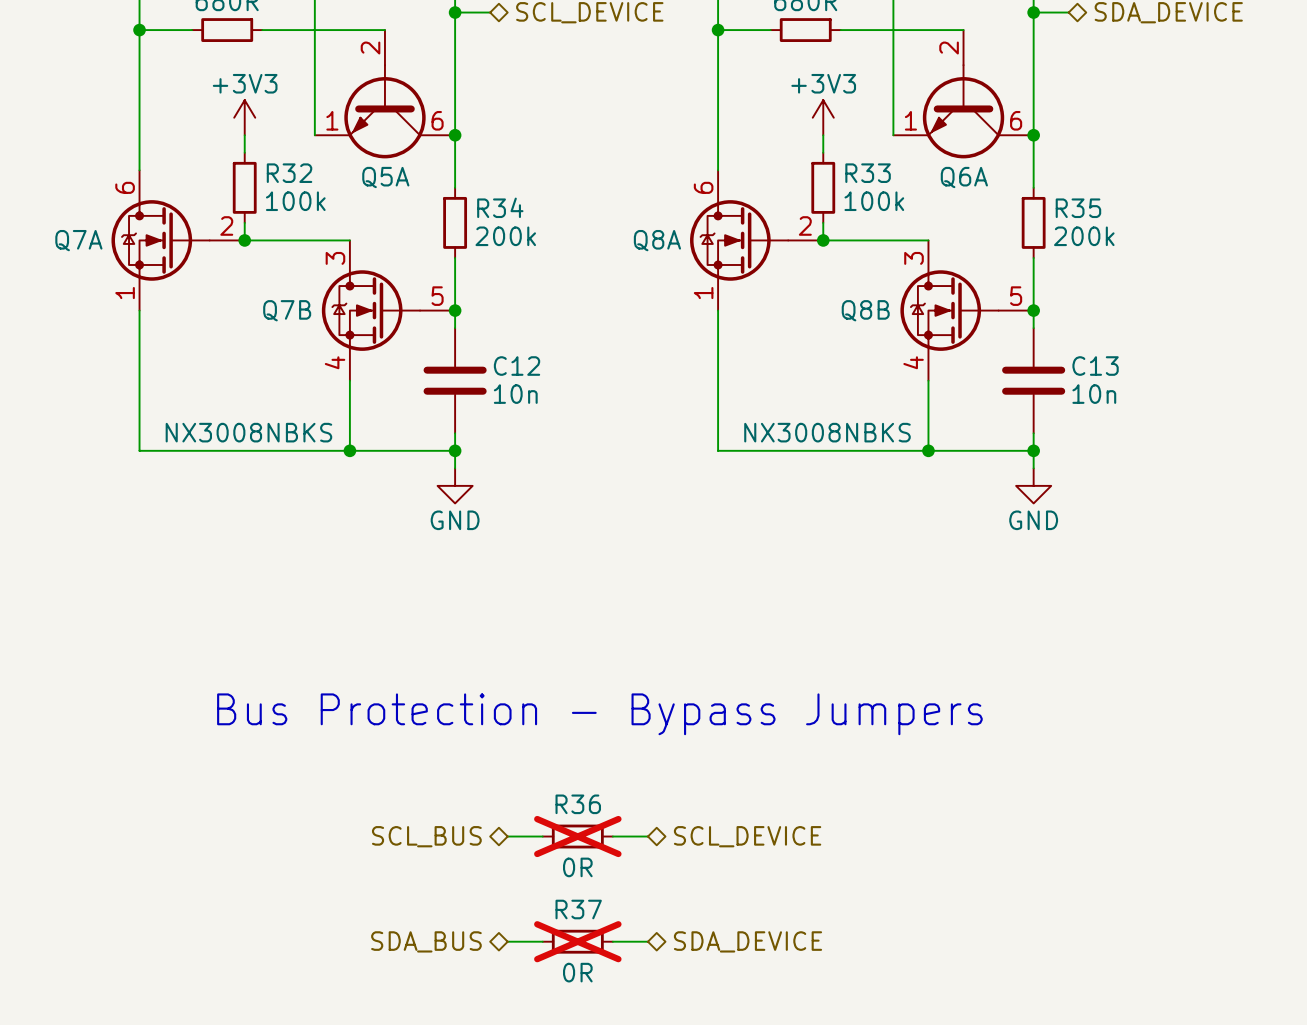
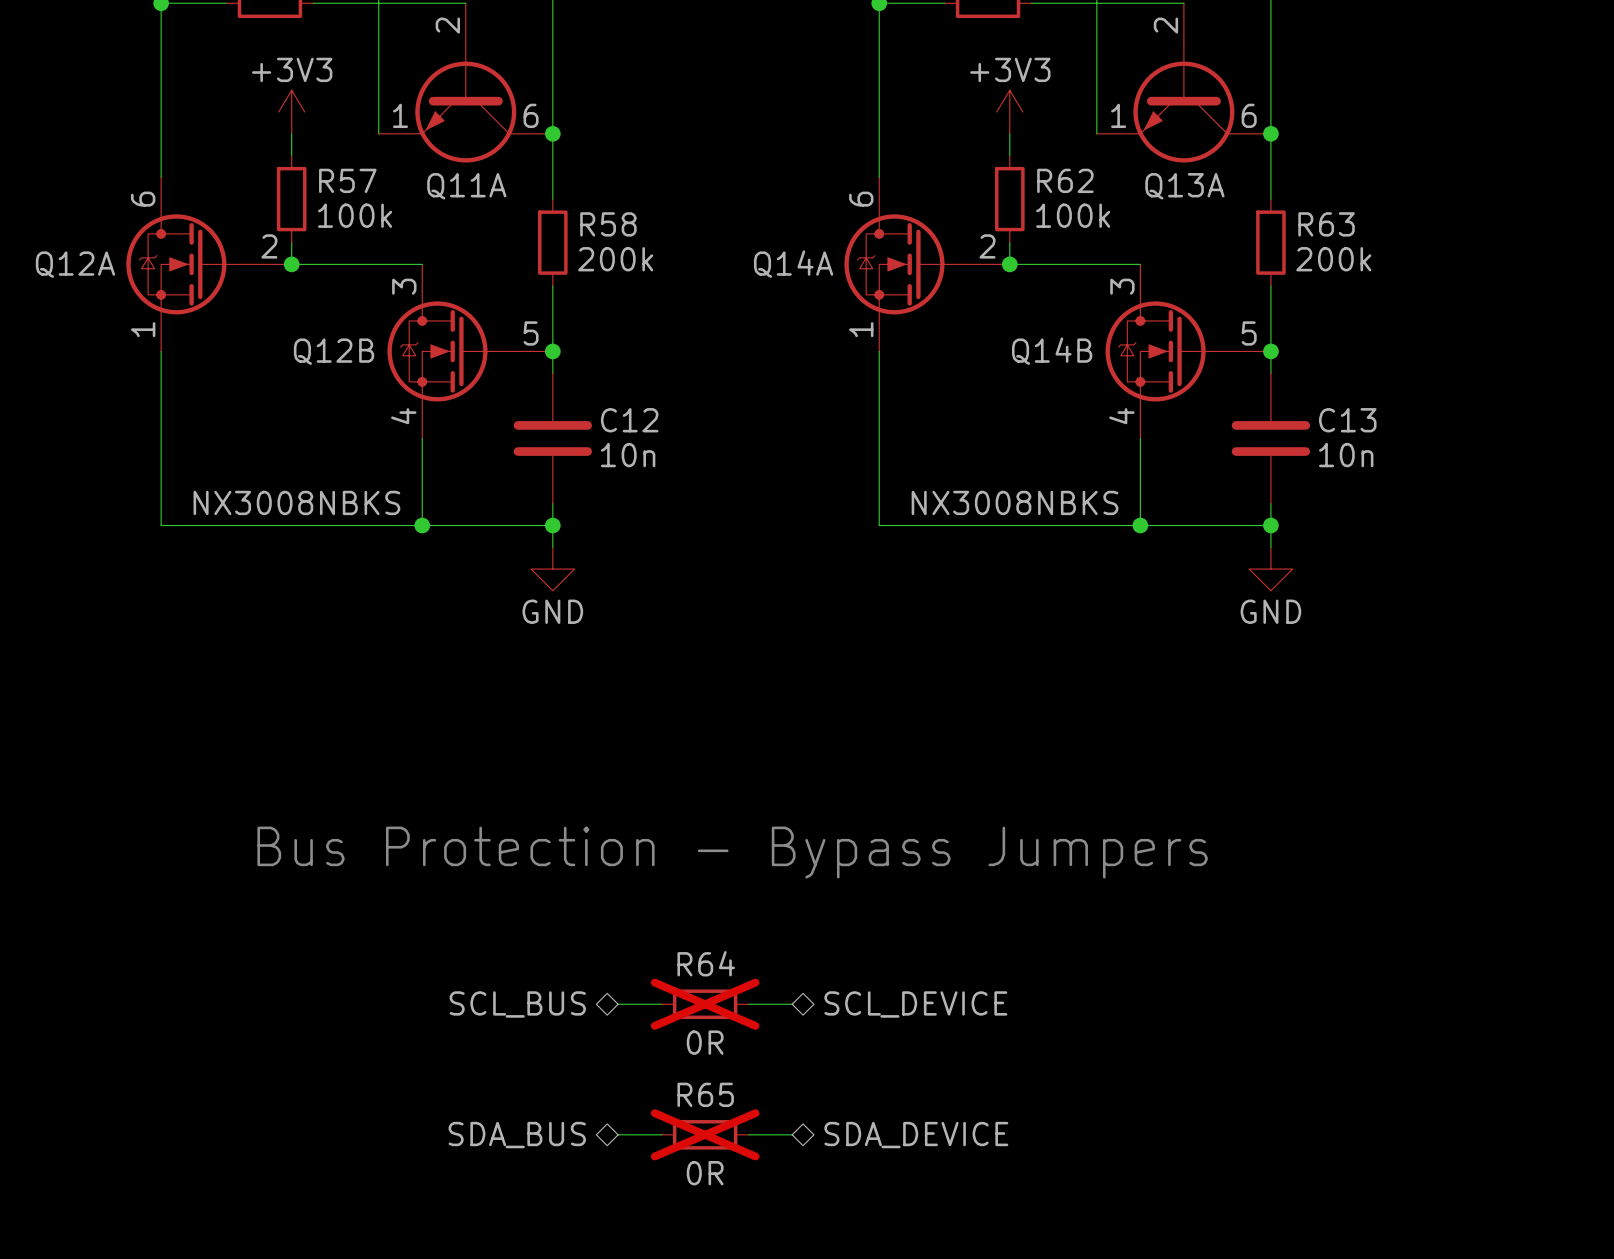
R32 name: R32 (289, 173) -> R57 (347, 180)
R33 name: R33 (868, 173) -> R62 (1065, 180)
Q5A name: Q5A (385, 177) -> Q11A (466, 186)
Q6A name: Q6A (964, 177) -> Q13A (1184, 186)
R34 name: R34 (500, 207) -> R58 (608, 224)
R35 name: R35 (1078, 208) -> R63 (1326, 224)
Q7A name: Q7A (78, 240) -> Q12A (75, 264)
Q8A name: Q8A (657, 240) -> Q14A (793, 264)
Q7B name: Q7B (287, 310) -> Q12B (334, 351)
Q8B name: Q8B (865, 310) -> Q14B (1052, 351)
R36 name: R36 (578, 804) -> R64 (706, 963)
R37 name: R37 (578, 909) -> R65 (705, 1094)

